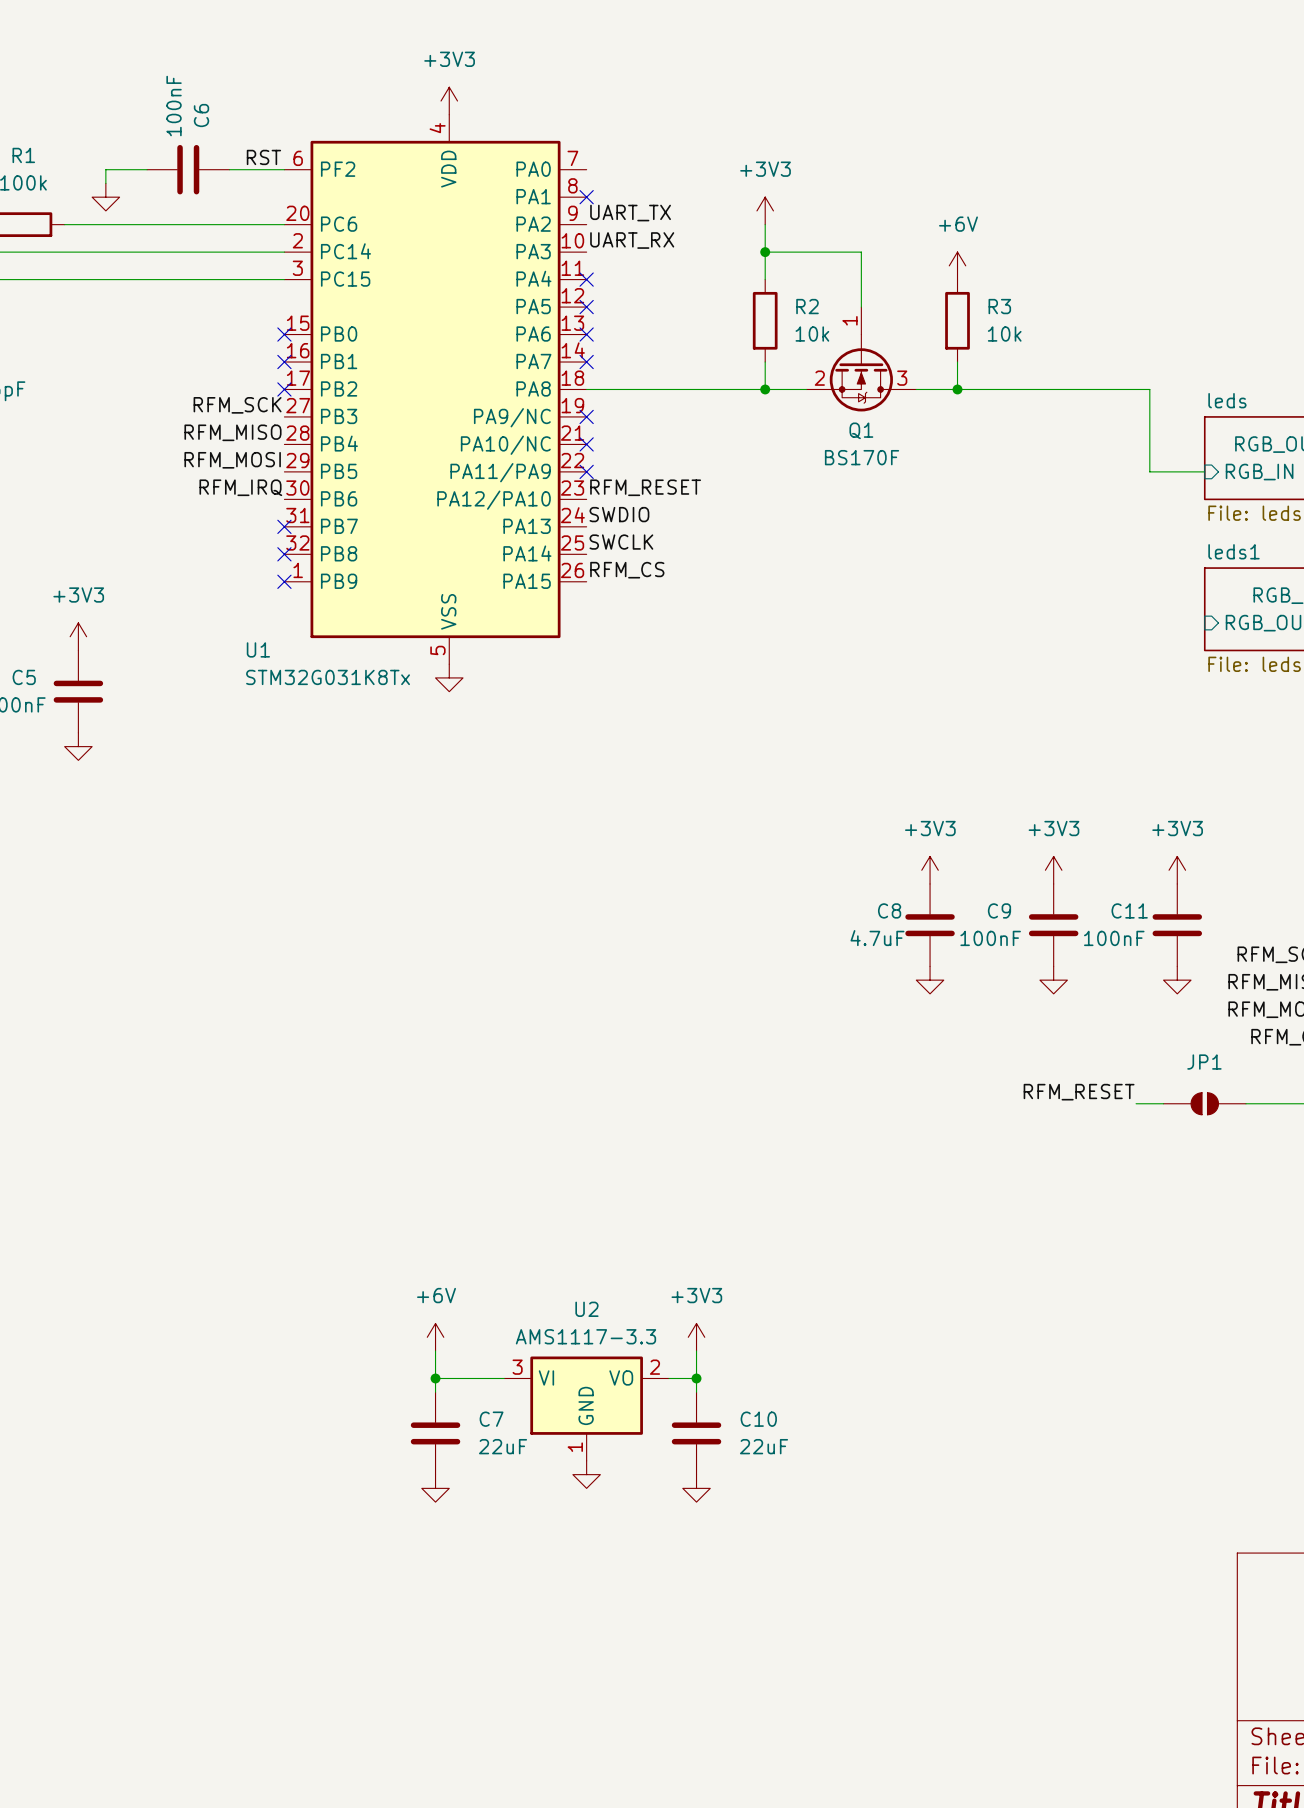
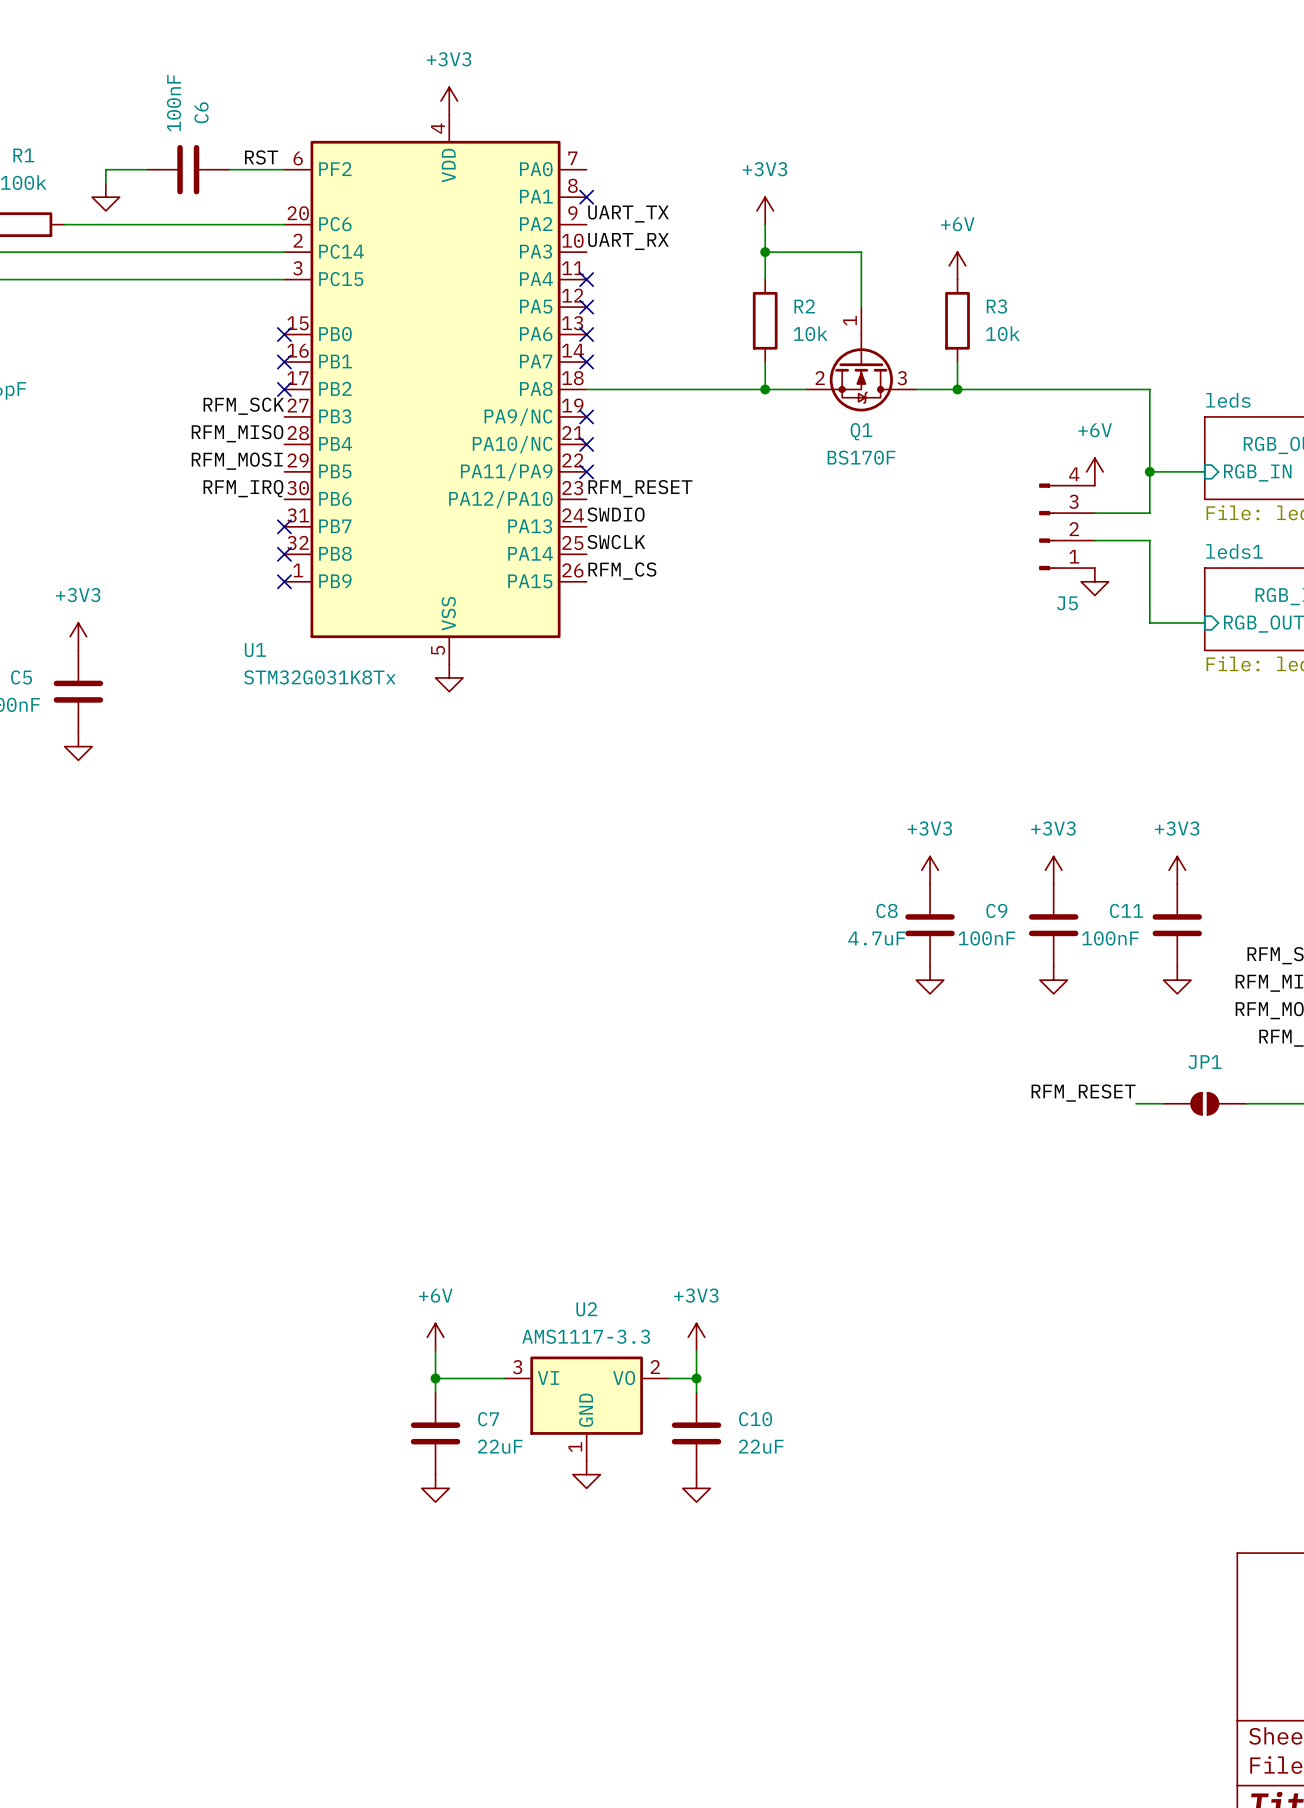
power symbol: none -> +6V (1094, 471)
wire: none -> (1149, 471) (1149, 513) (1094, 513)
junction: none -> (1149, 471)
J5: none -> (1066, 526)
wire: none -> (1094, 540) (1149, 540) (1149, 622) (1204, 622)
power symbol: none -> (1094, 581)

